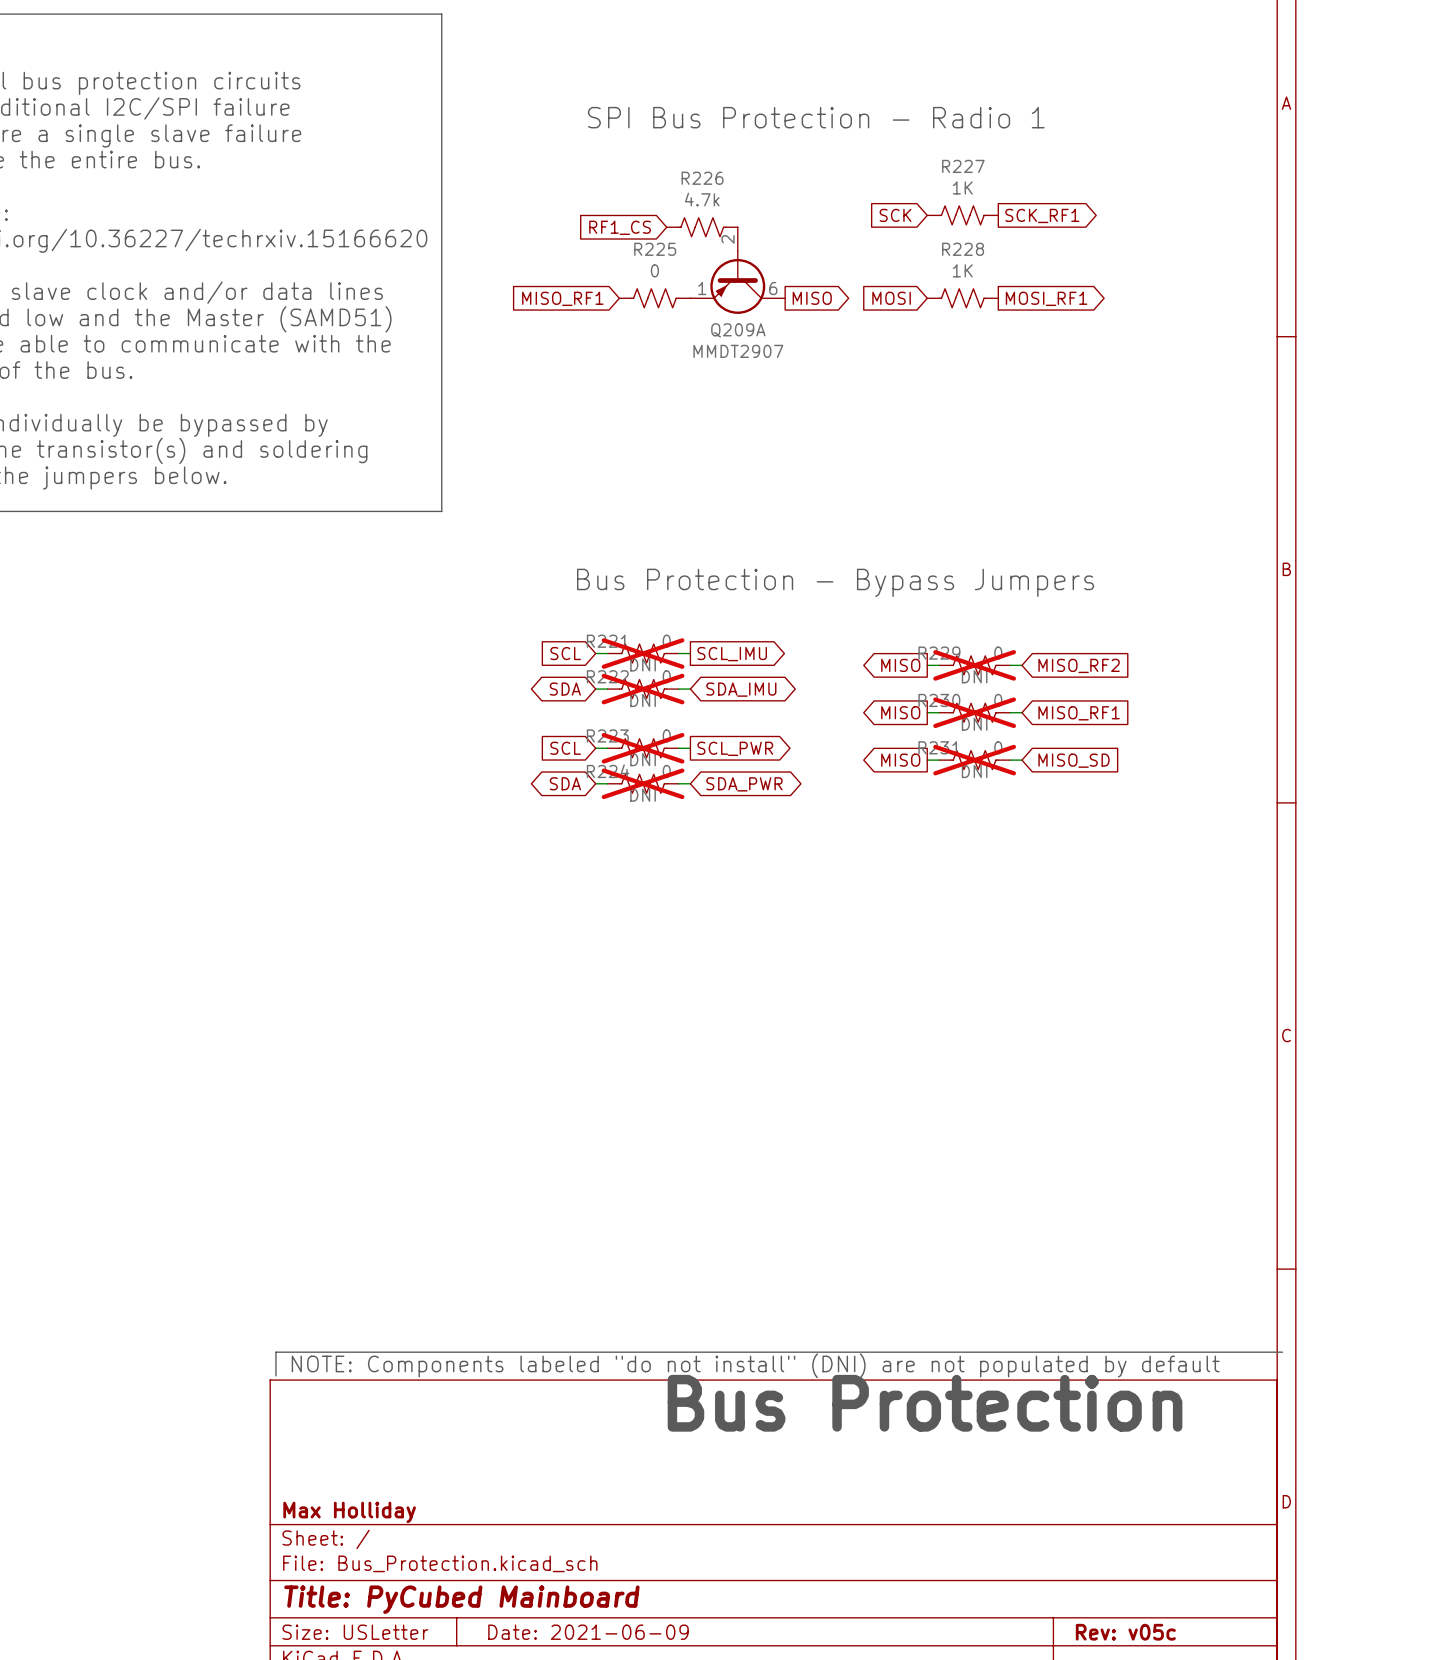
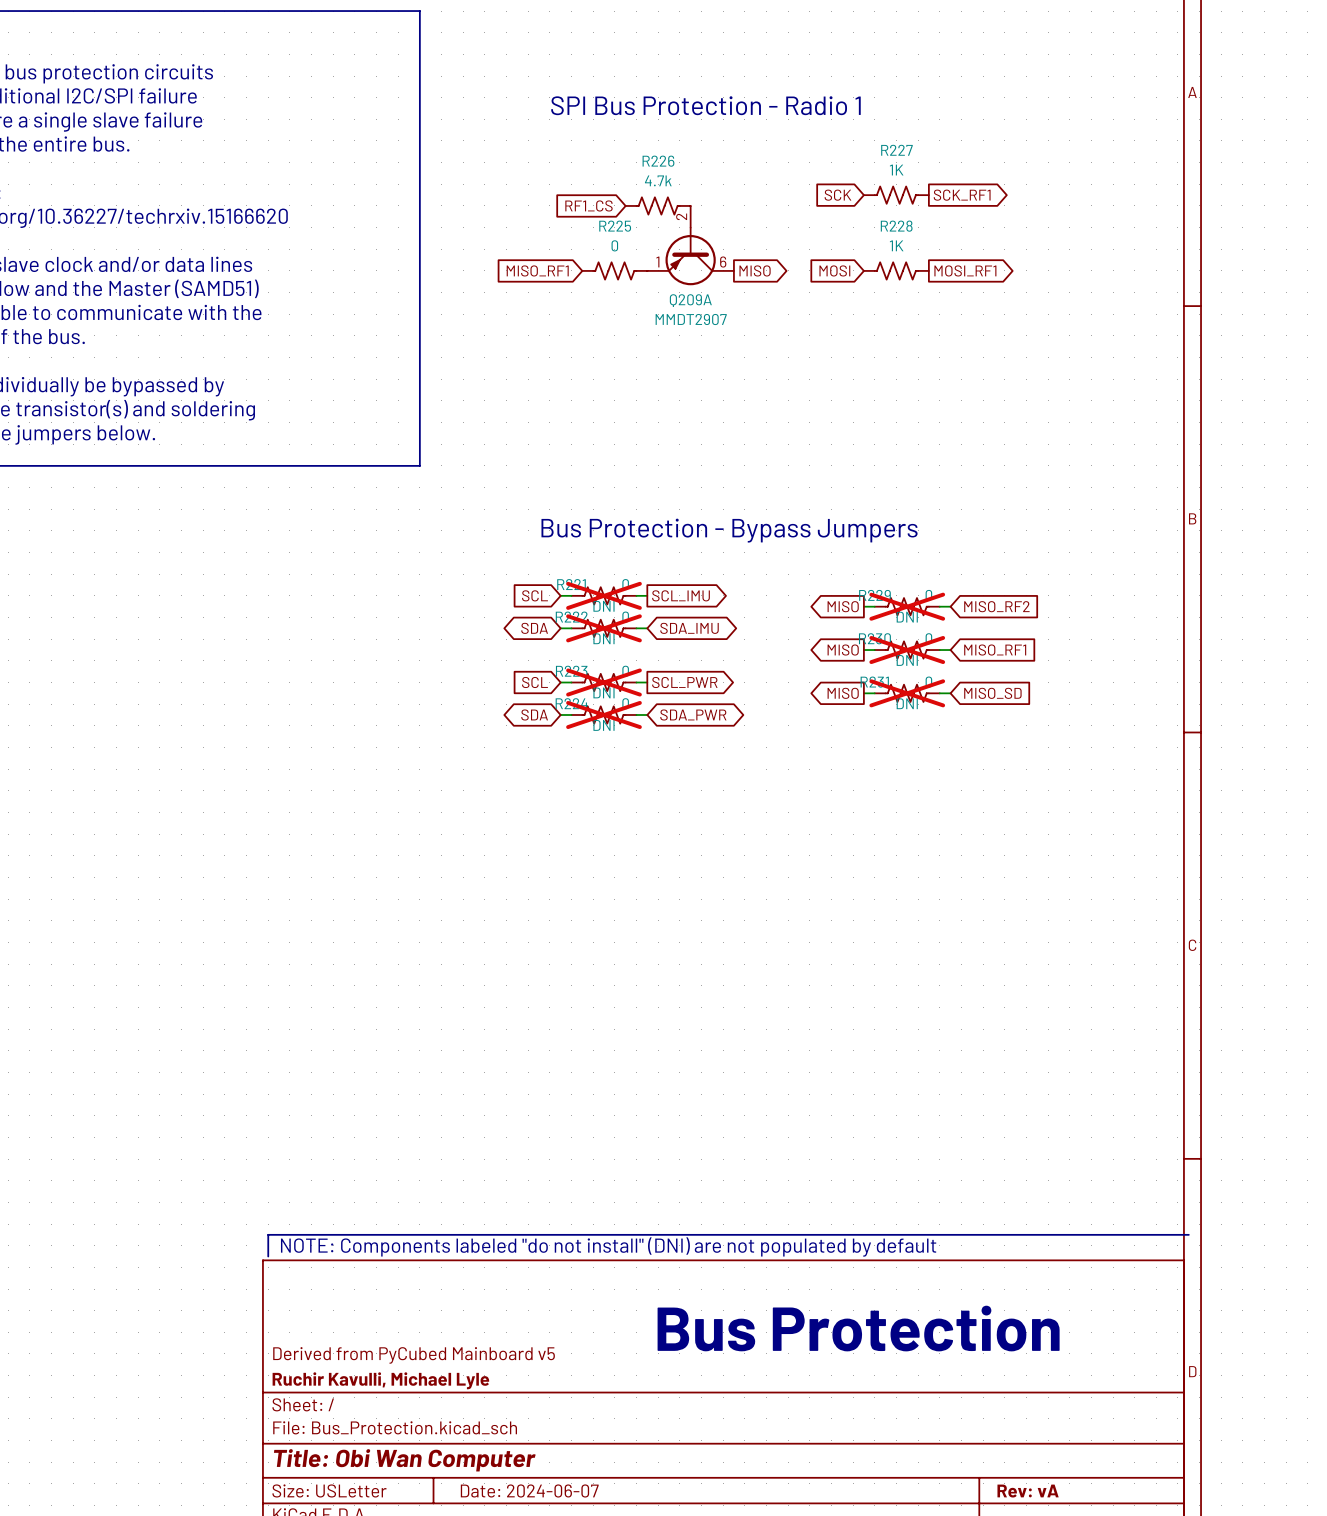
text position: Bus Protection (925, 1403) -> Bus Protection (858, 1328)
title block: none -> Derived from PyCubed Mainboard v5 (414, 1355)
title block: Max Holliday (349, 1512) -> Ruchir Kavulli, Michael Lyle (380, 1380)
title block: Title: PyCubed Mainboard (461, 1599) -> Title: Obi Wan Computer (404, 1460)
title block: Date: 2021-06-09 (588, 1632) -> Date: 2024-06-07 (529, 1490)
title block: Rev: v05c (1125, 1632) -> Rev: vA (1028, 1491)

